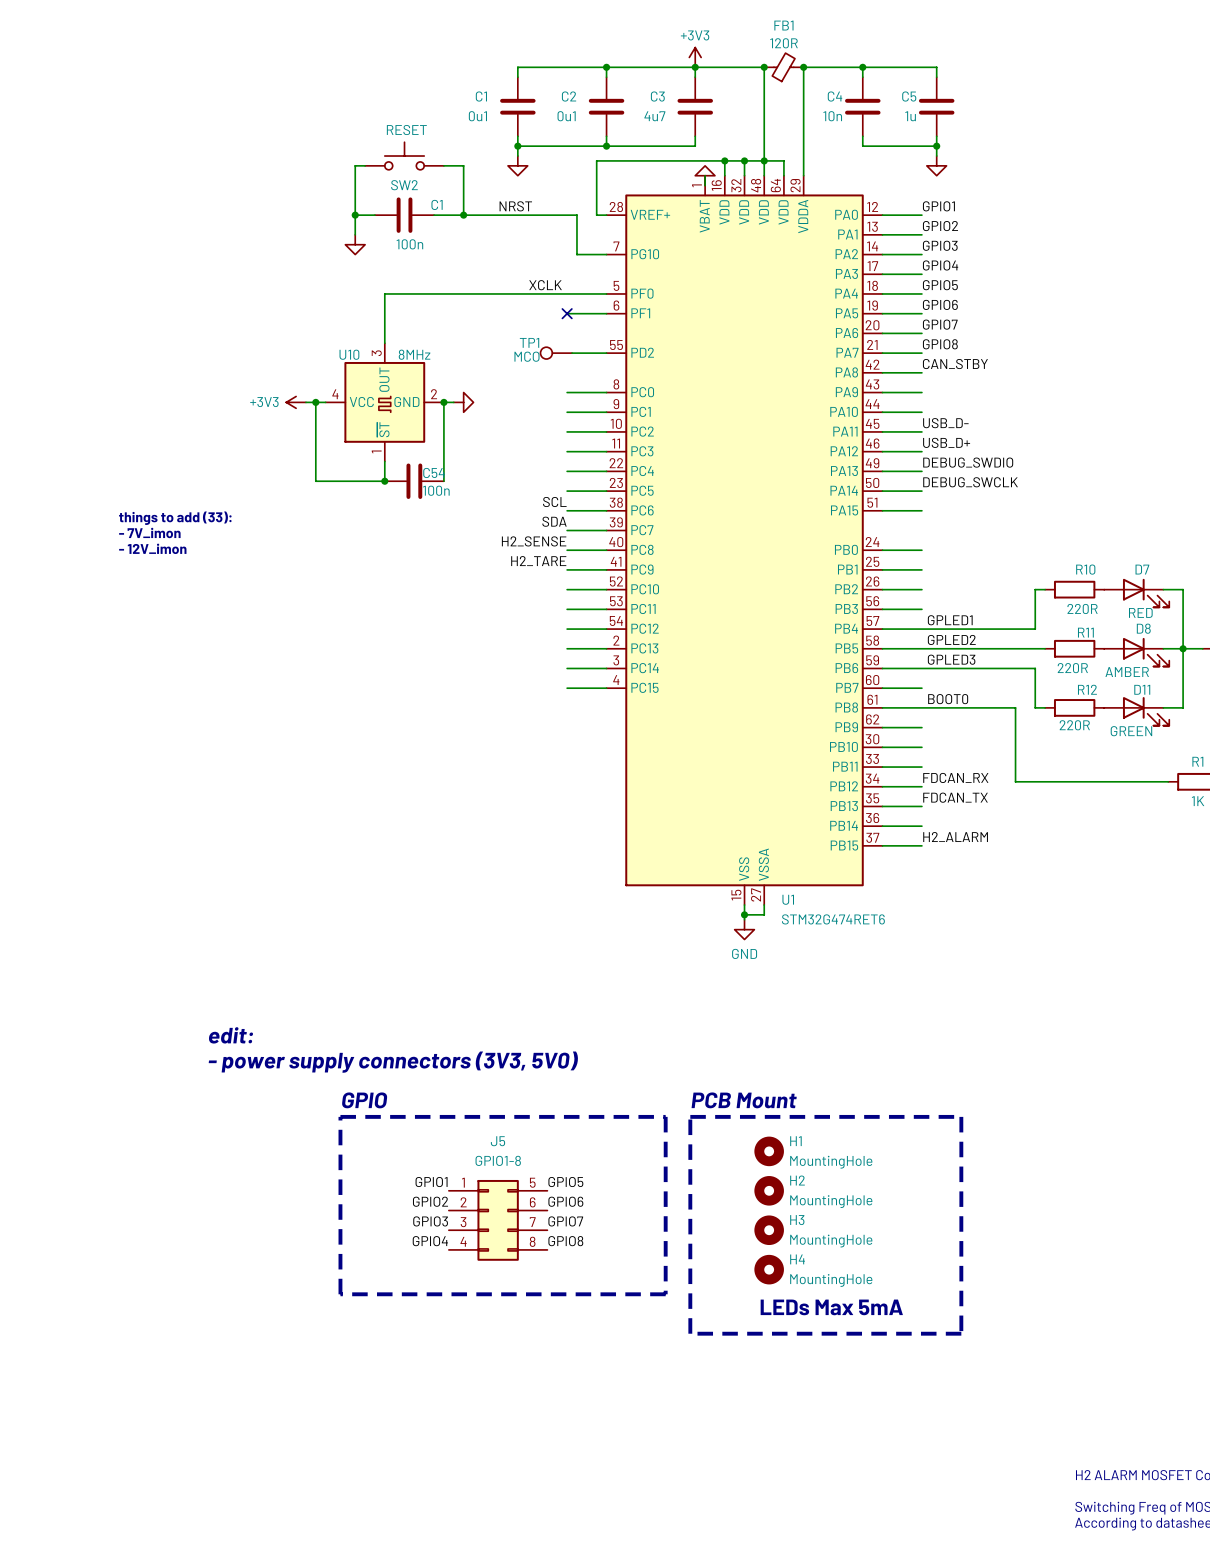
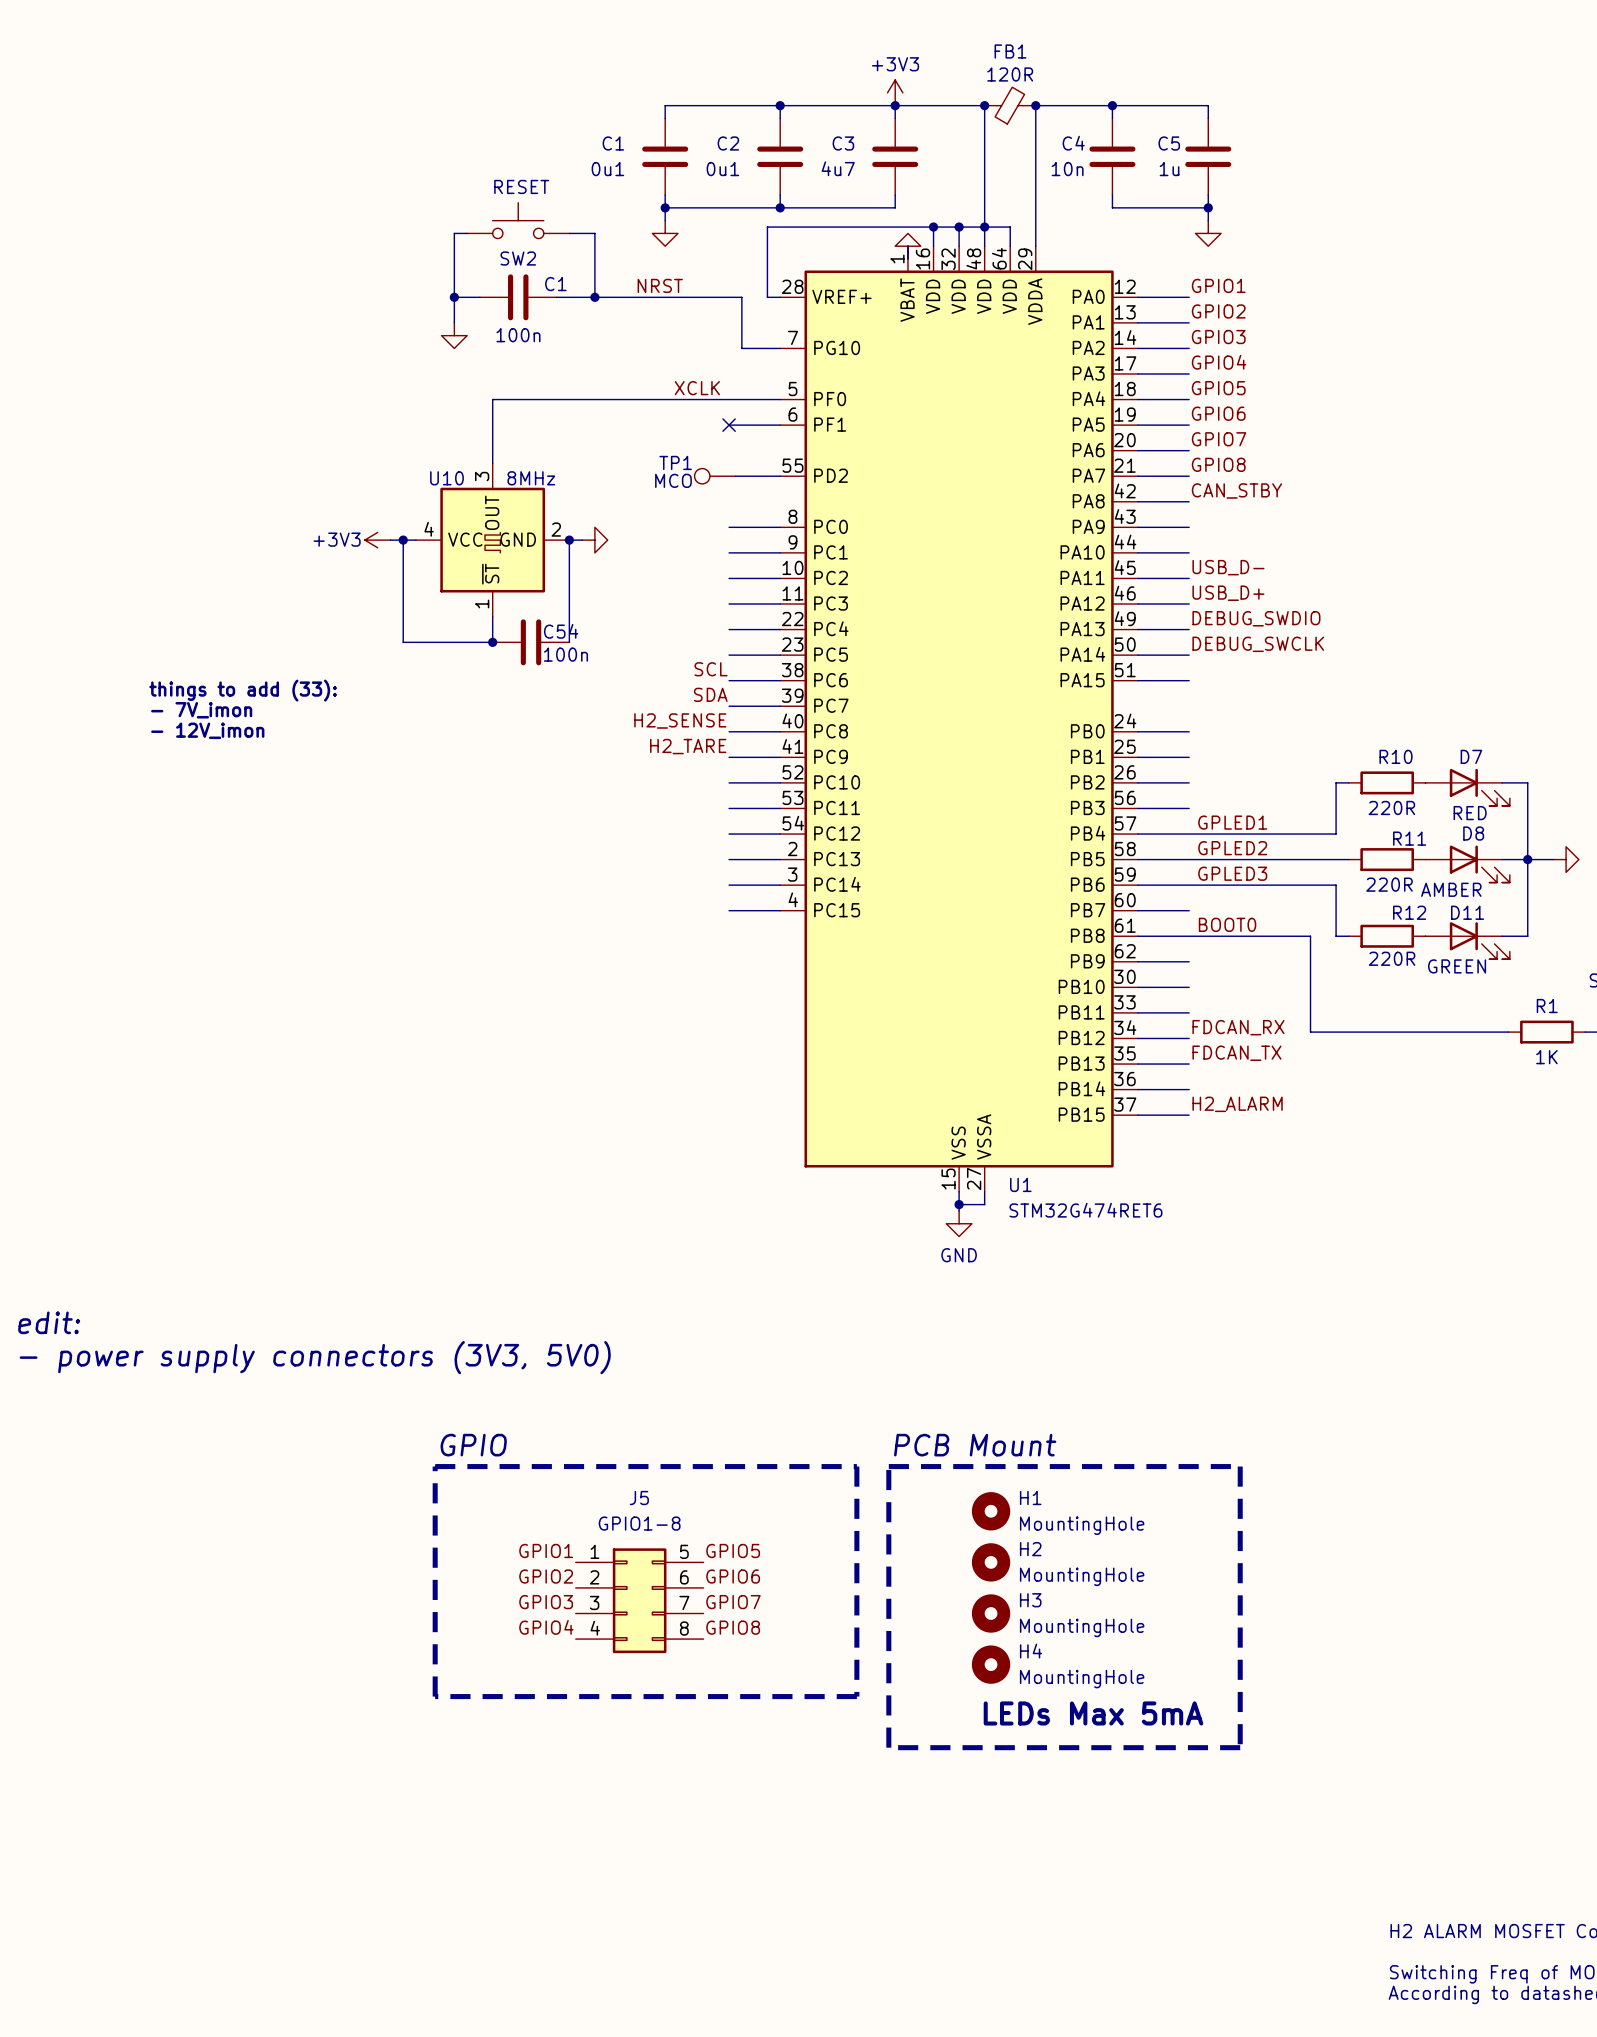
text: none -> edit: (49, 1322)
text: none -> - power supply connectors (3V3, 5V0) (315, 1357)
text: edit: (230, 1035) -> none
text: - power supply connectors (3V3, 5V0) (393, 1062) -> none

